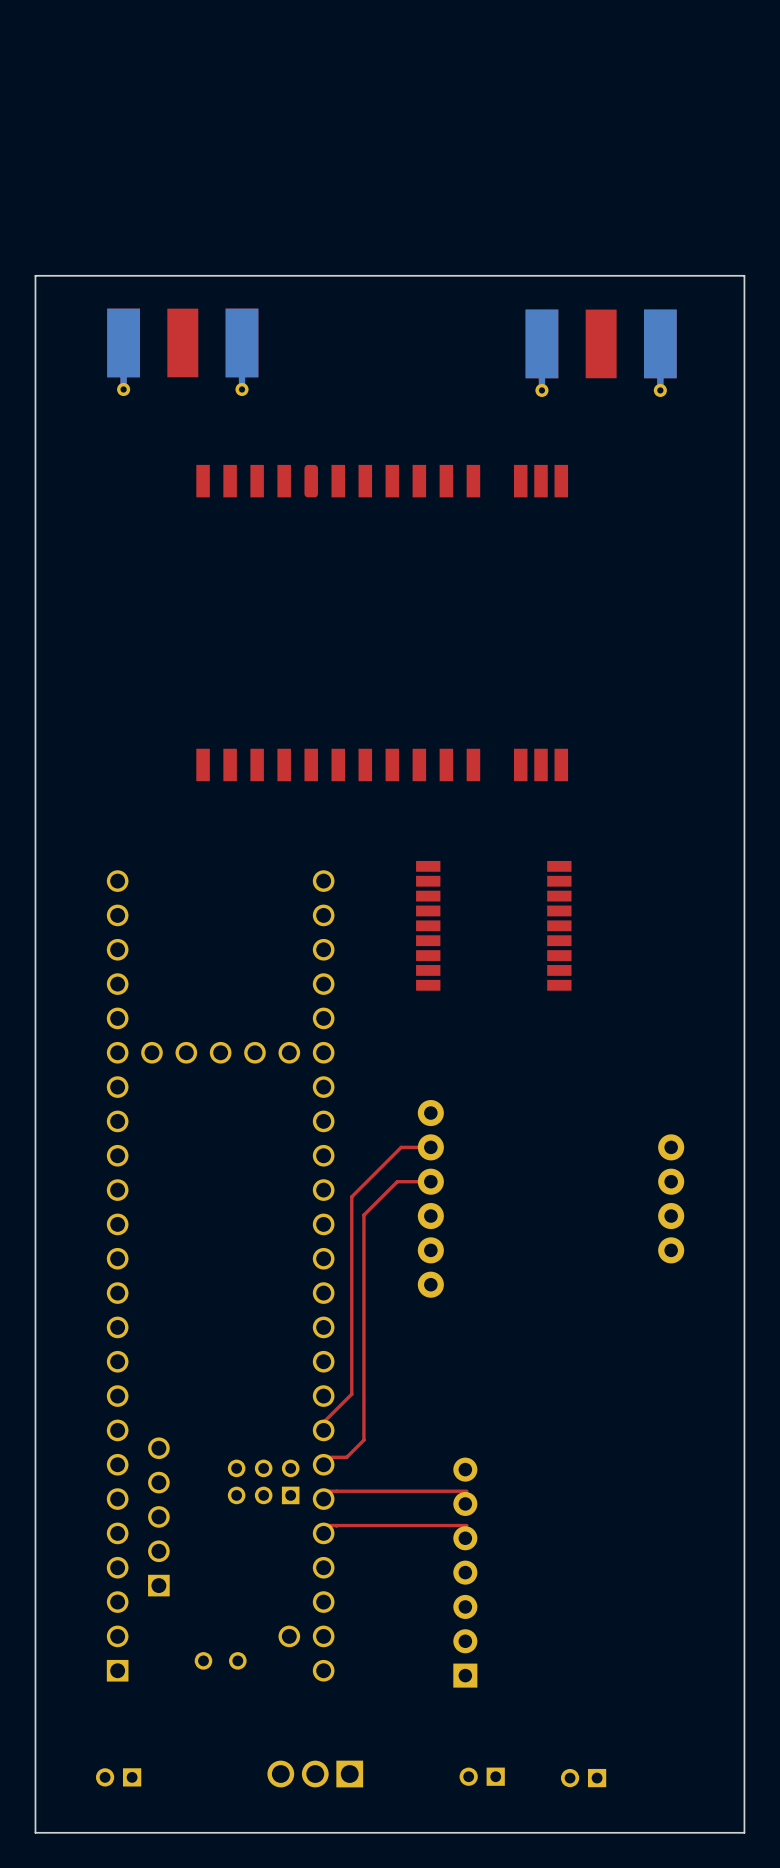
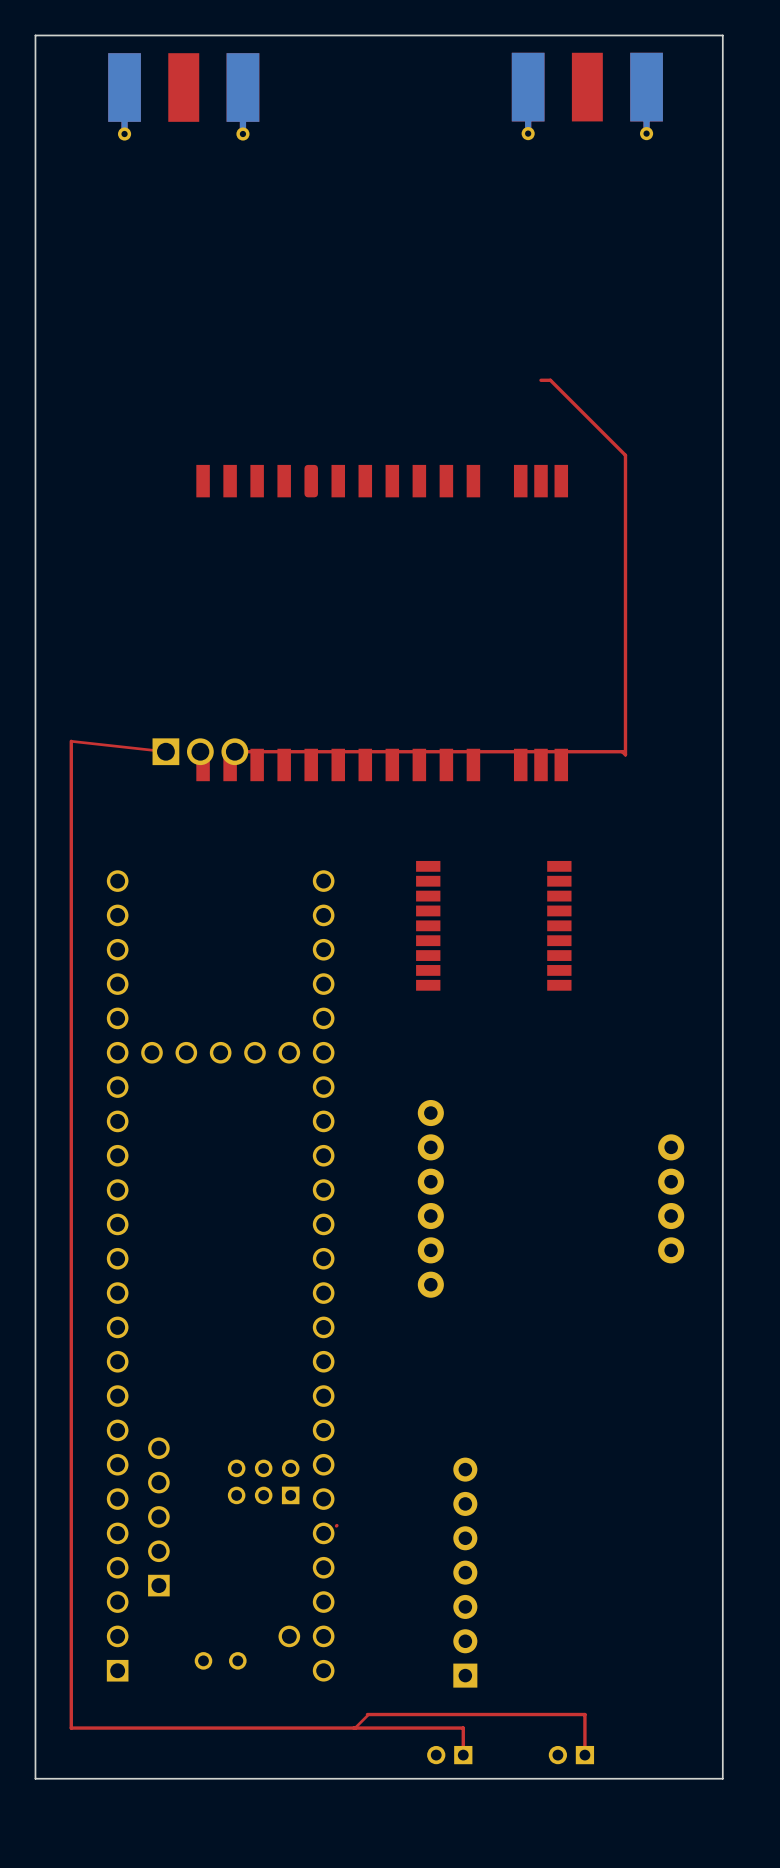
part: none -> (183, 96)
part: none -> (587, 96)
board edge: (35, 275) (744, 275) (744, 1832) (35, 1832) (35, 1778) -> (35, 275) (35, 35) (722, 35) (722, 1778) (35, 1778)
part: (182, 352) -> none
part: (601, 353) -> none
top track: none -> (541, 380) (550, 380) (625, 455) (625, 754) (622, 751) (234, 751)
top track: none -> (165, 751) (71, 741) (71, 1728) (463, 1728) (463, 1755)
part: none -> (200, 751)
top track: (430, 1147) (401, 1147) (351, 1196) (351, 1394) (322, 1422) -> none
top track: (430, 1181) (397, 1181) (363, 1215) (363, 1440) (346, 1457) (322, 1457) -> none
top track: (466, 1491) (322, 1491) -> none
top track: (466, 1525) (322, 1525) -> none
top track: none -> (367, 1714) (584, 1714) (584, 1755)
top track: none -> (368, 1714) (355, 1728)
part: (315, 1774) -> none
part position: (482, 1776) -> (449, 1755)
part: (118, 1777) -> none
part position: (583, 1778) -> (571, 1755)

